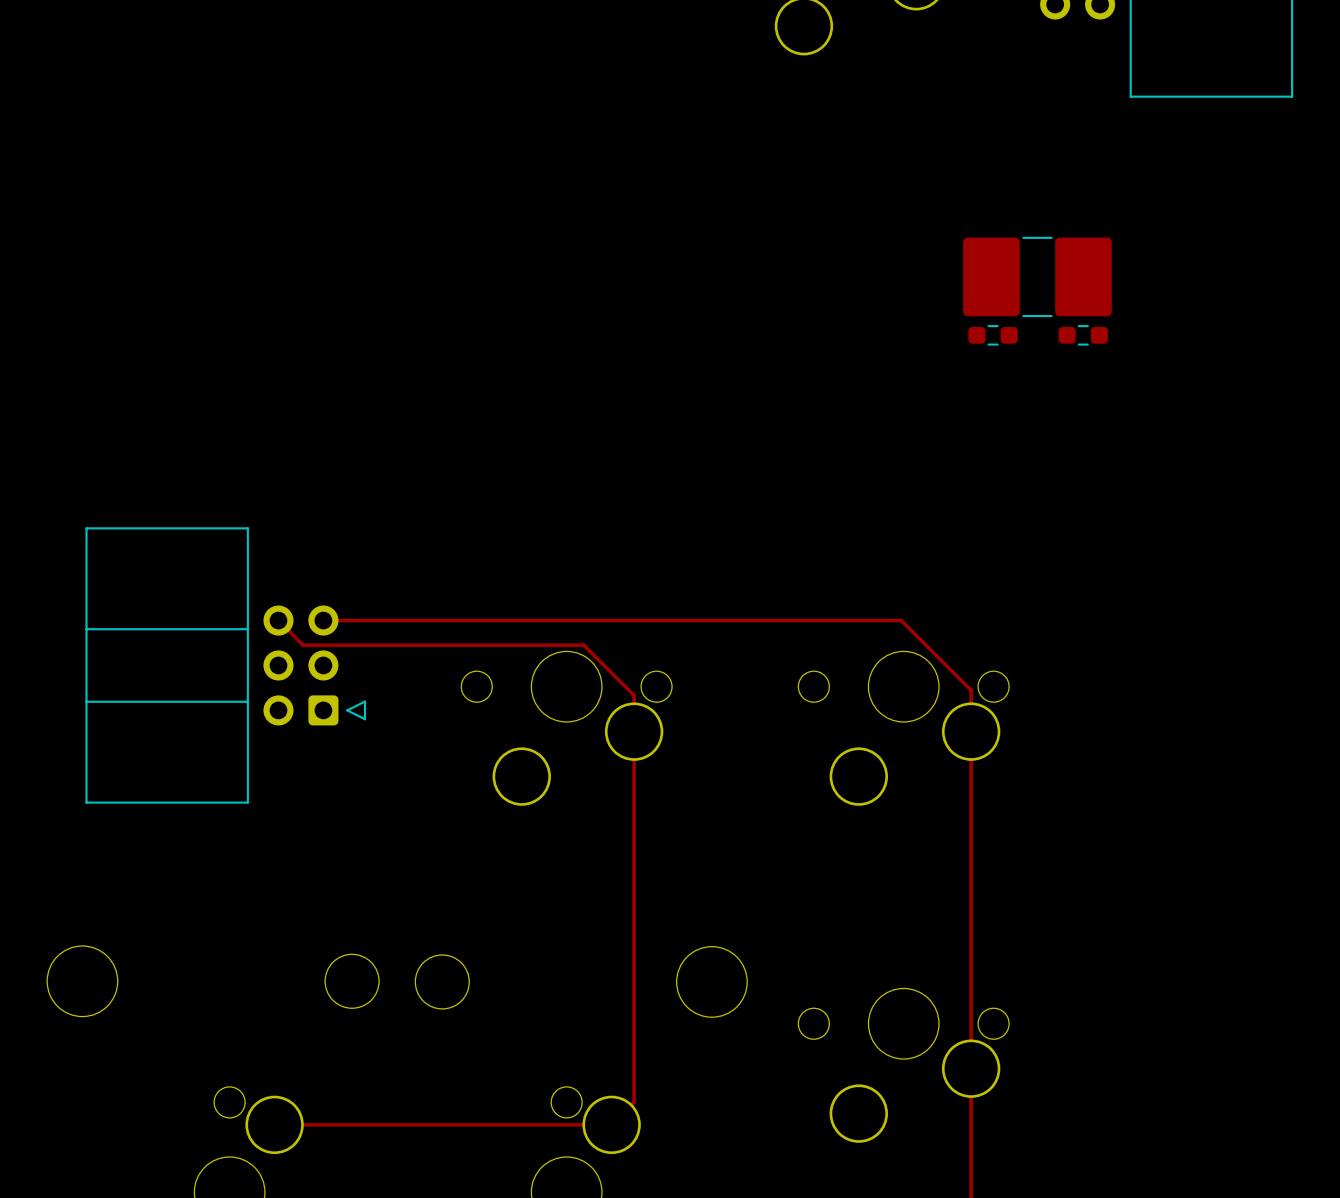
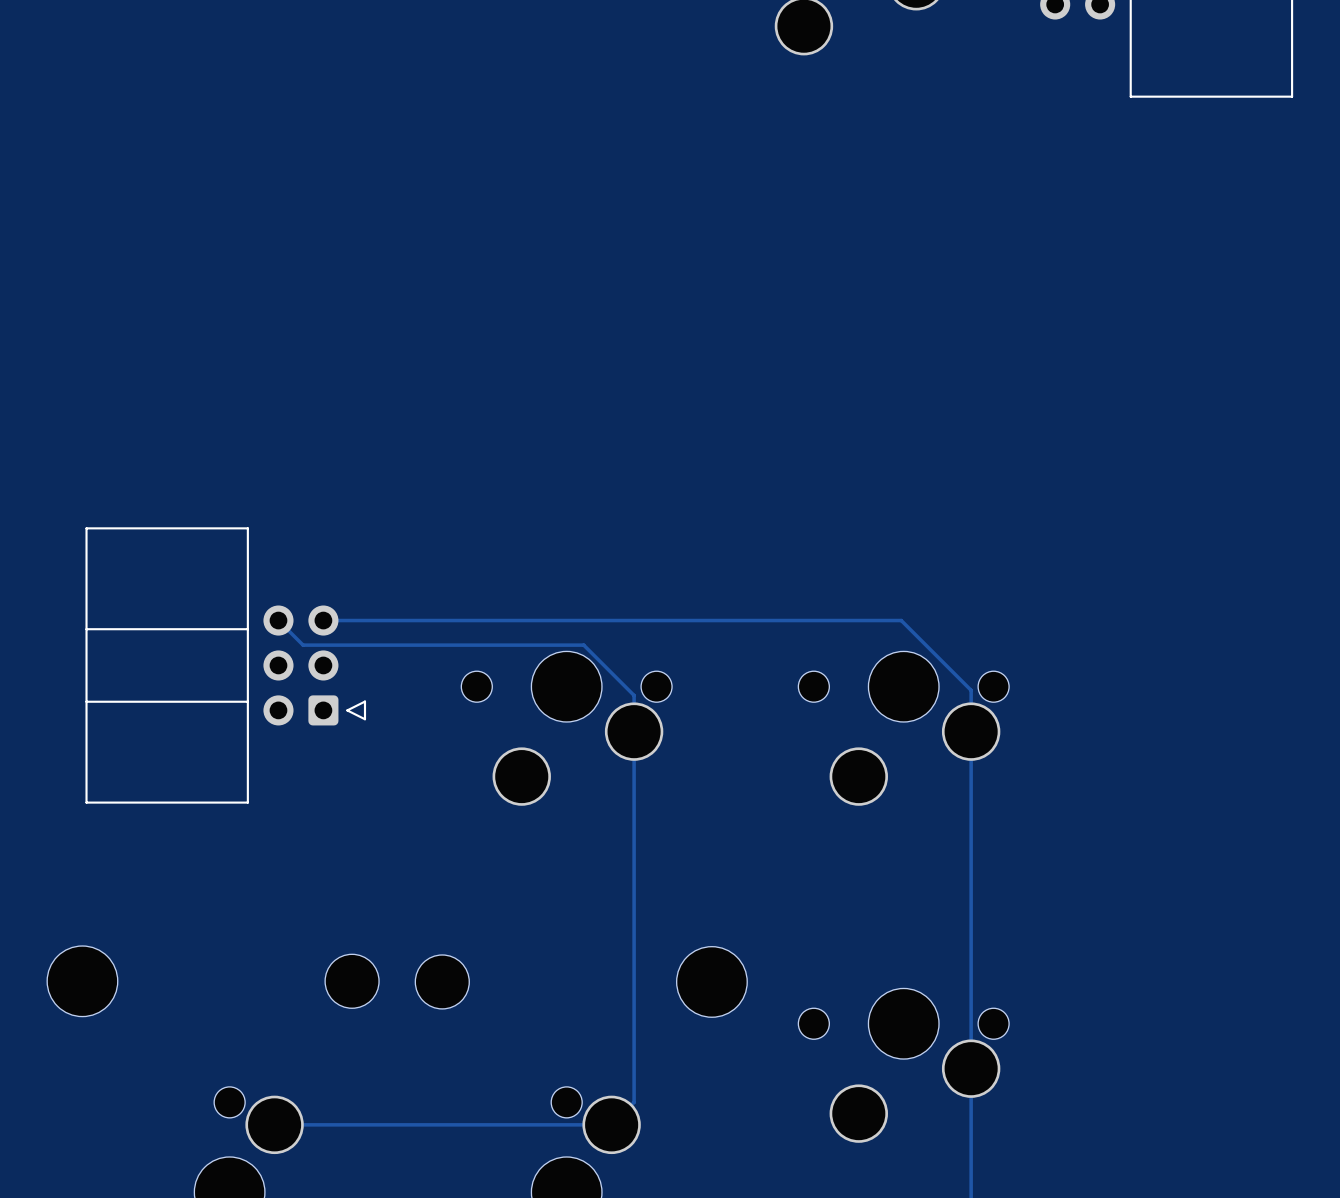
part: (1037, 276) -> none
part: (993, 335) -> none
part: (1083, 335) -> none

